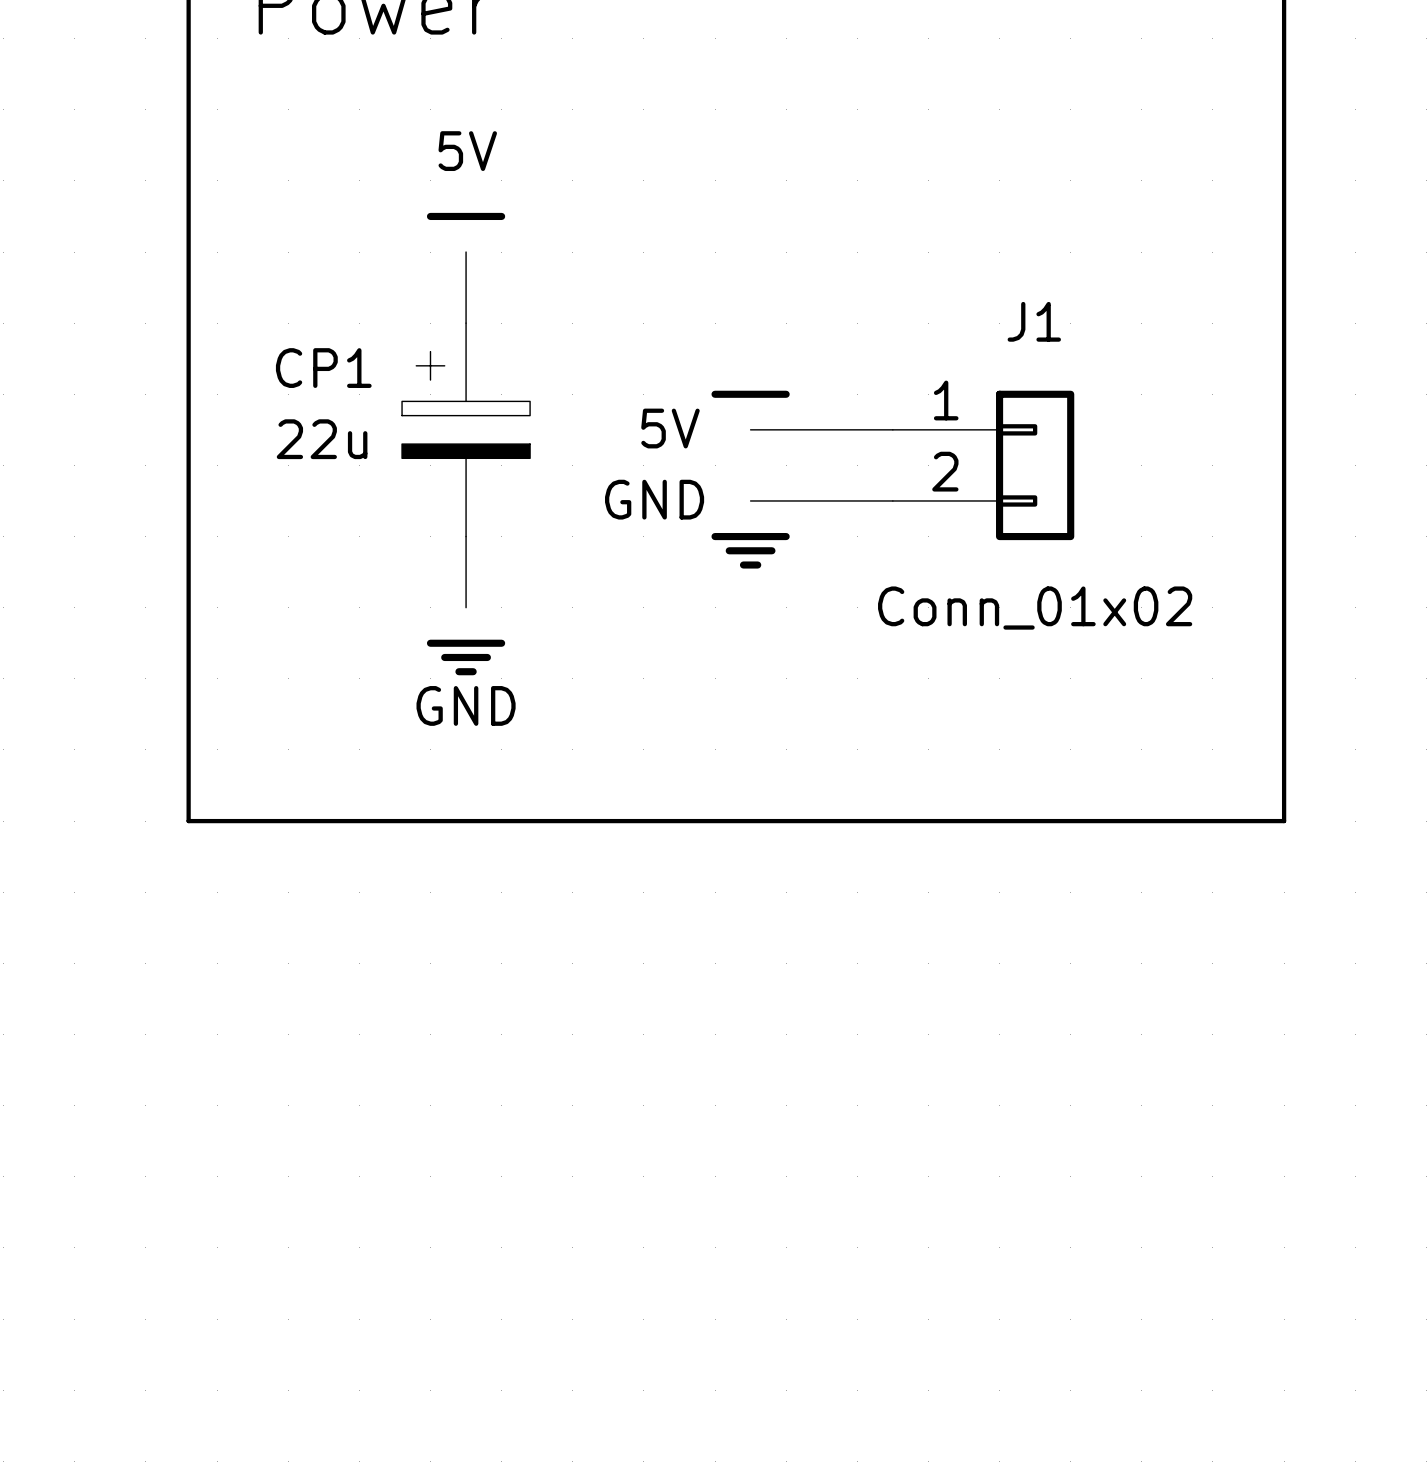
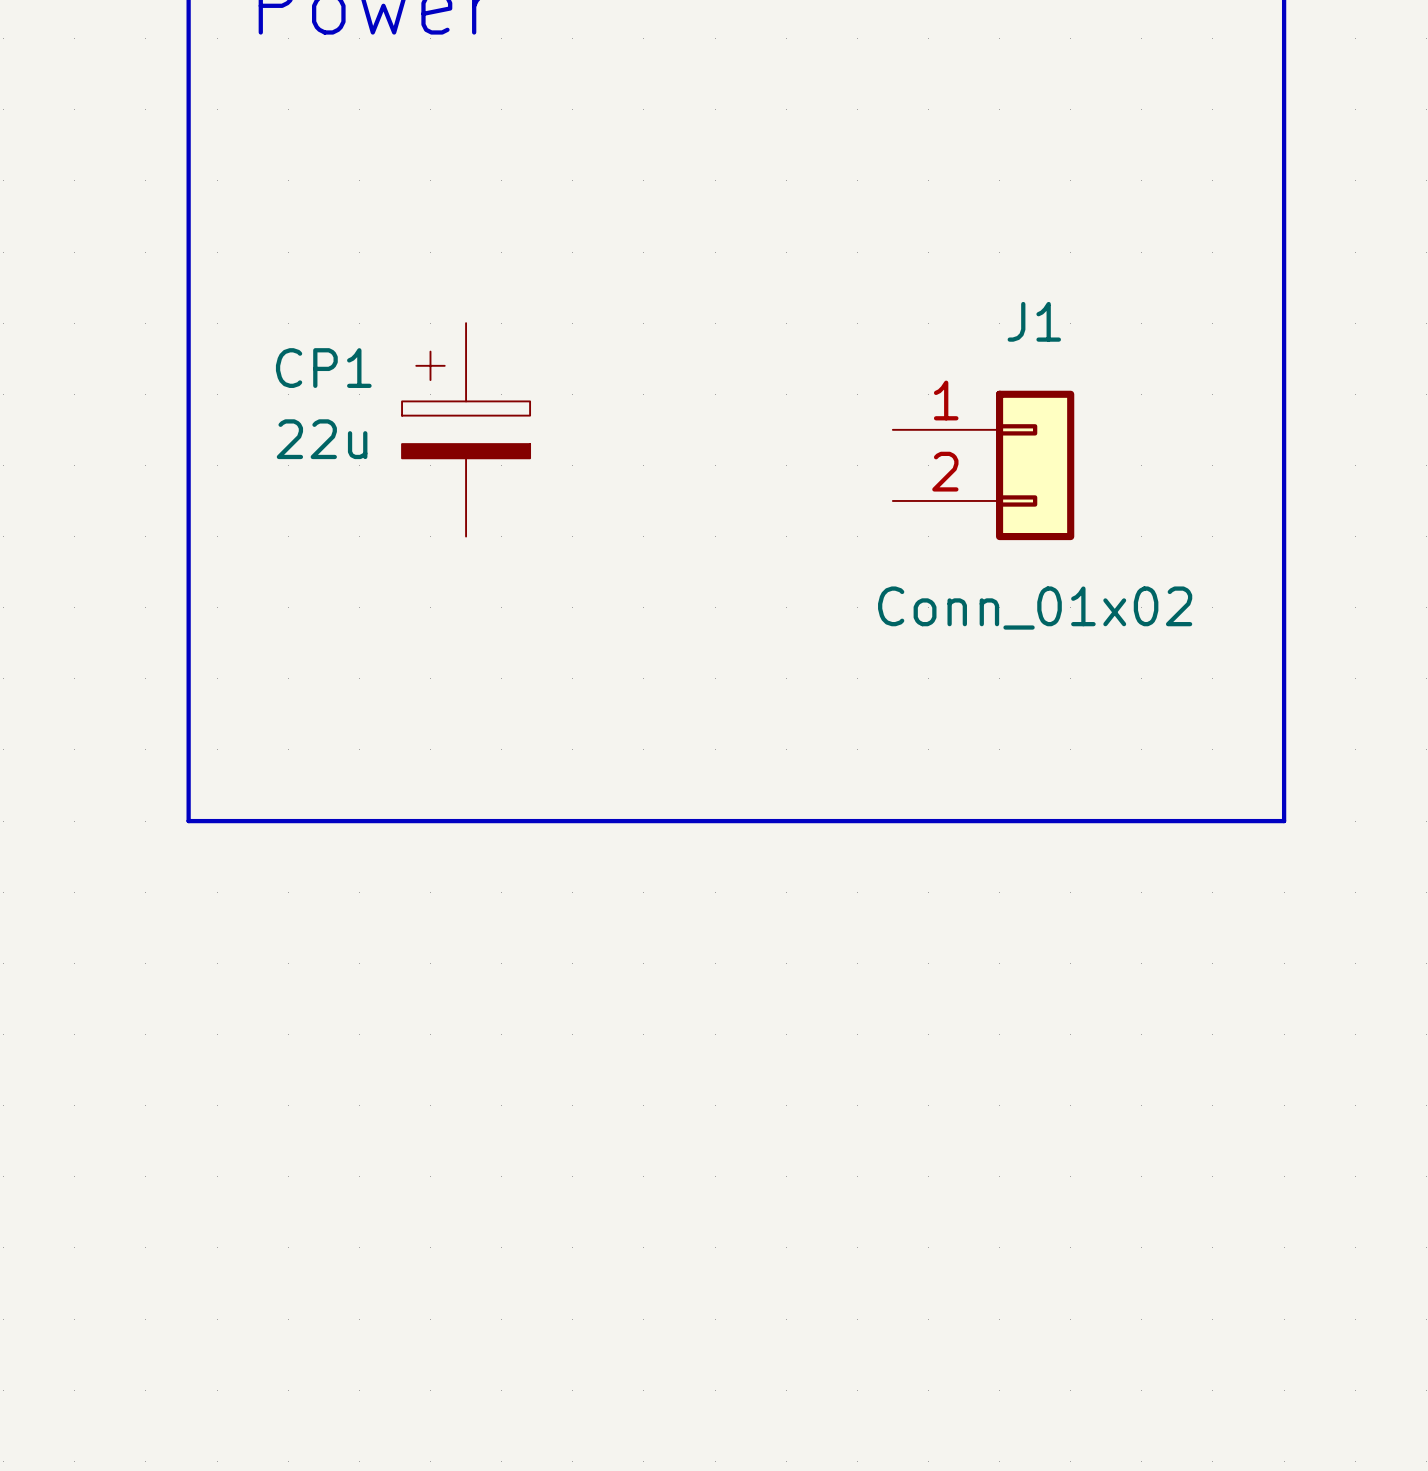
power symbol: 5V (466, 216) -> none
wire: (466, 252) (466, 323) -> none
power symbol: 5V (750, 394) -> none
wire: (750, 429) (892, 429) -> none
wire: (750, 500) (892, 500) -> none
wire: (466, 536) (466, 607) -> none
power symbol: GND (750, 550) -> none
power symbol: GND (466, 657) -> none

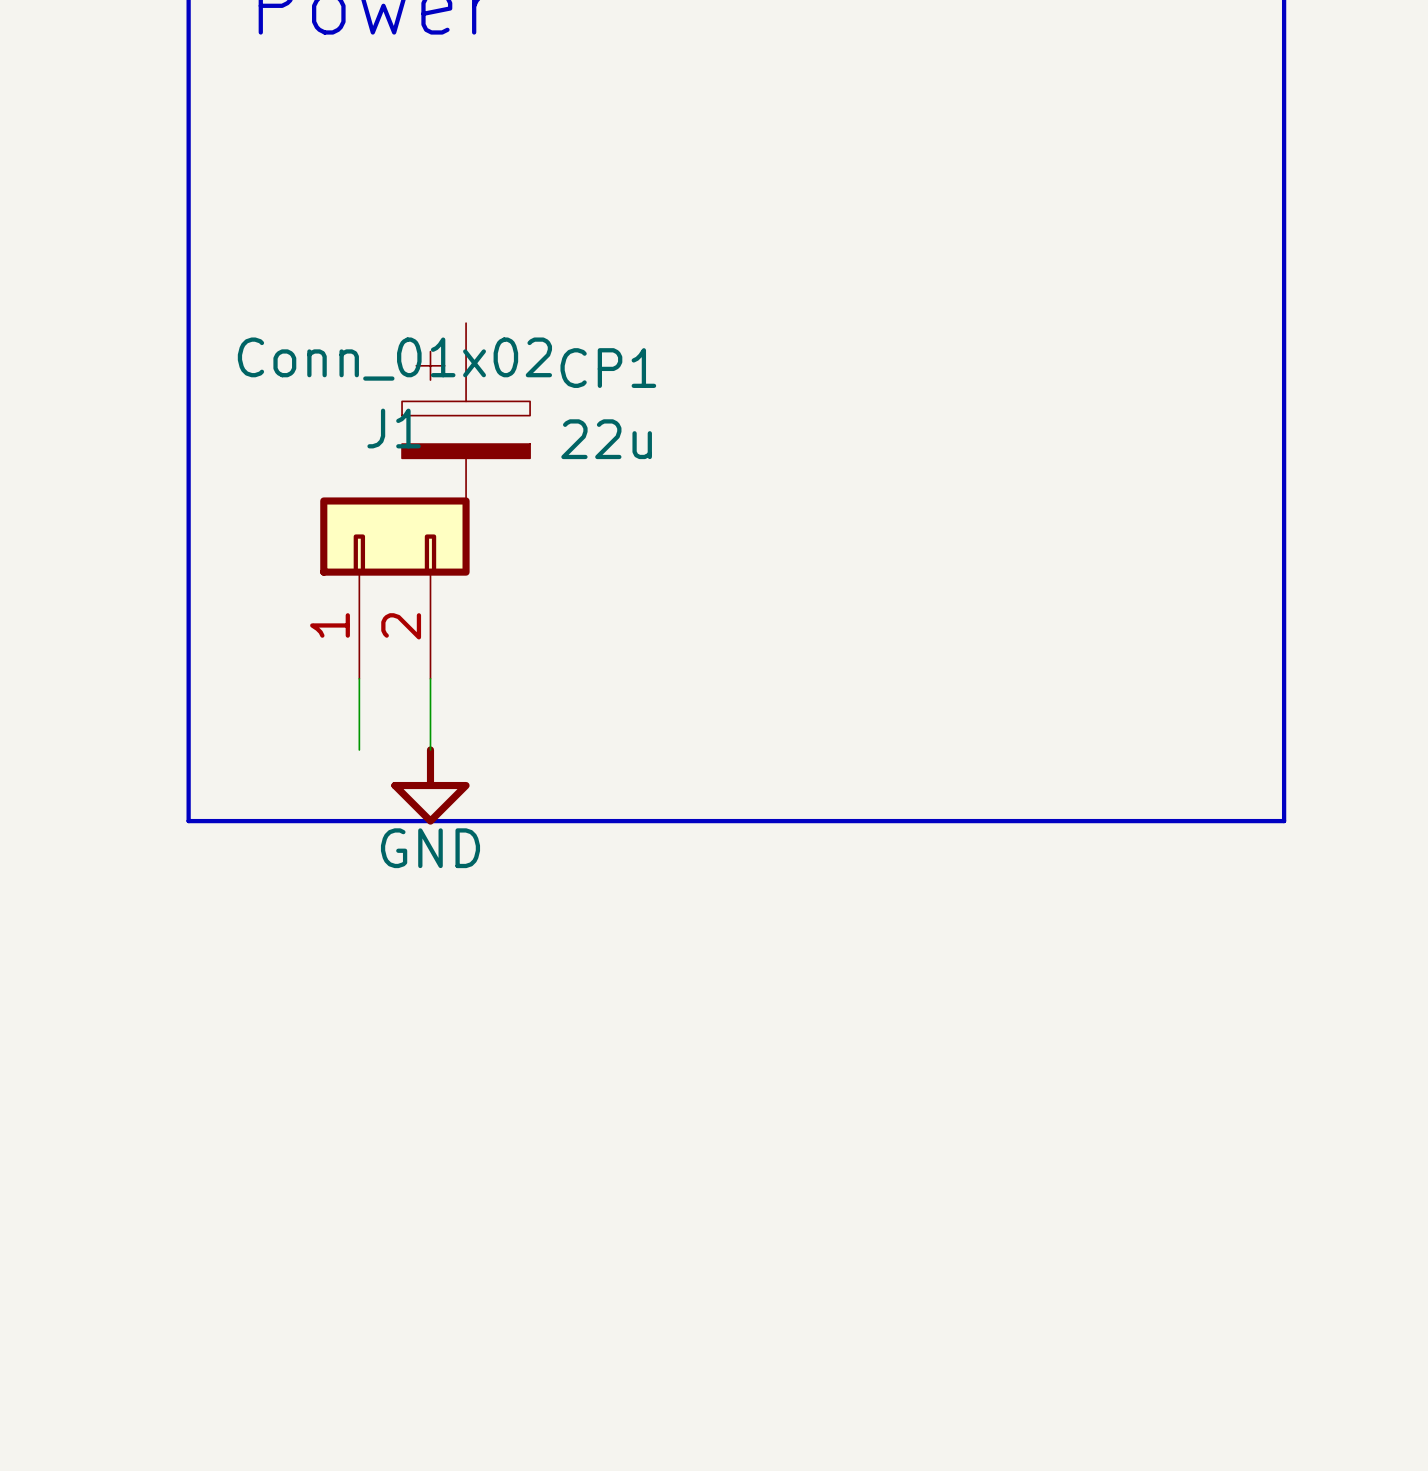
CP1 name position: CP1 (323, 368) -> CP1 (608, 368)
CP1 value position: 22u (322, 439) -> 22u (606, 439)
J1 position: (983, 465) -> (394, 588)
J1 rotation: 0° (1035, 465) -> 90° counterclockwise (394, 536)
J1 value position: Conn_01x02 (1035, 608) -> Conn_01x02 (394, 359)
wire: none -> (359, 678) (359, 749)
wire: none -> (430, 678) (430, 749)
power symbol: none -> GND (430, 785)

